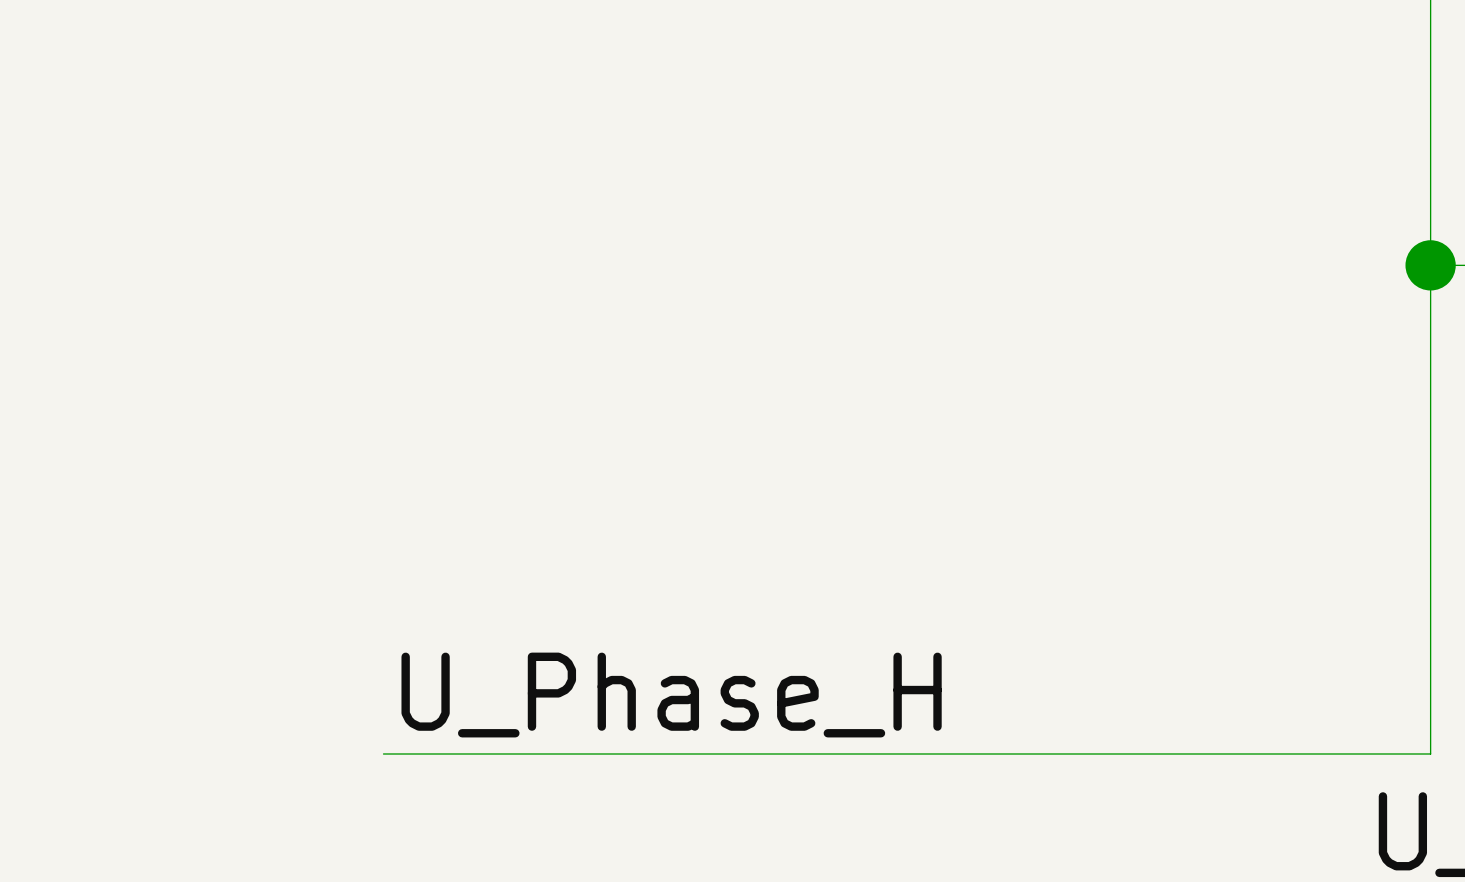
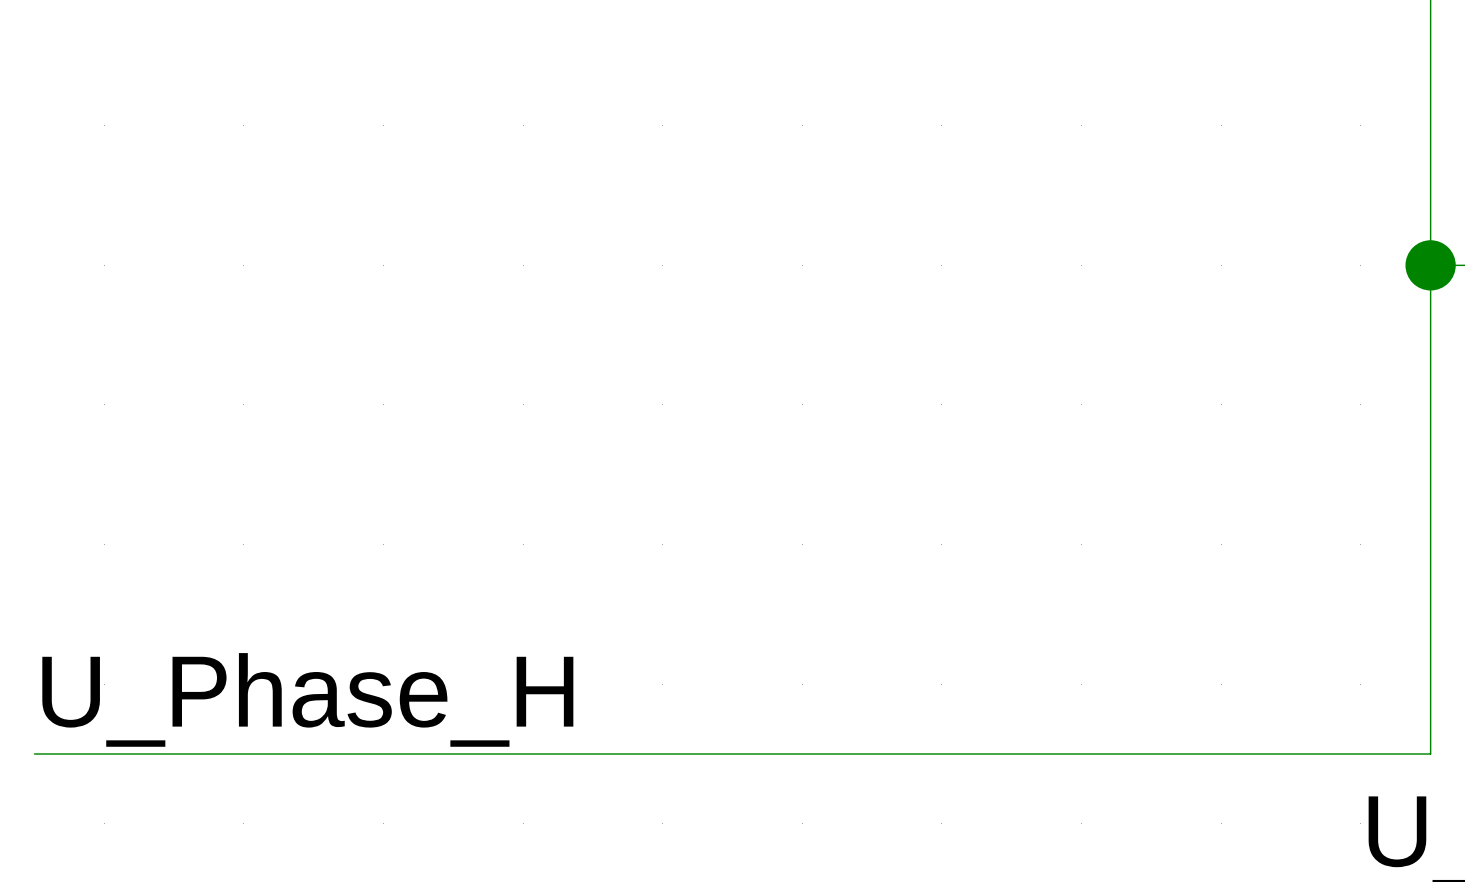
label position: U_Phase_H (671, 695) -> U_Phase_H (307, 699)
wire: none -> (34, 753) (383, 753)

